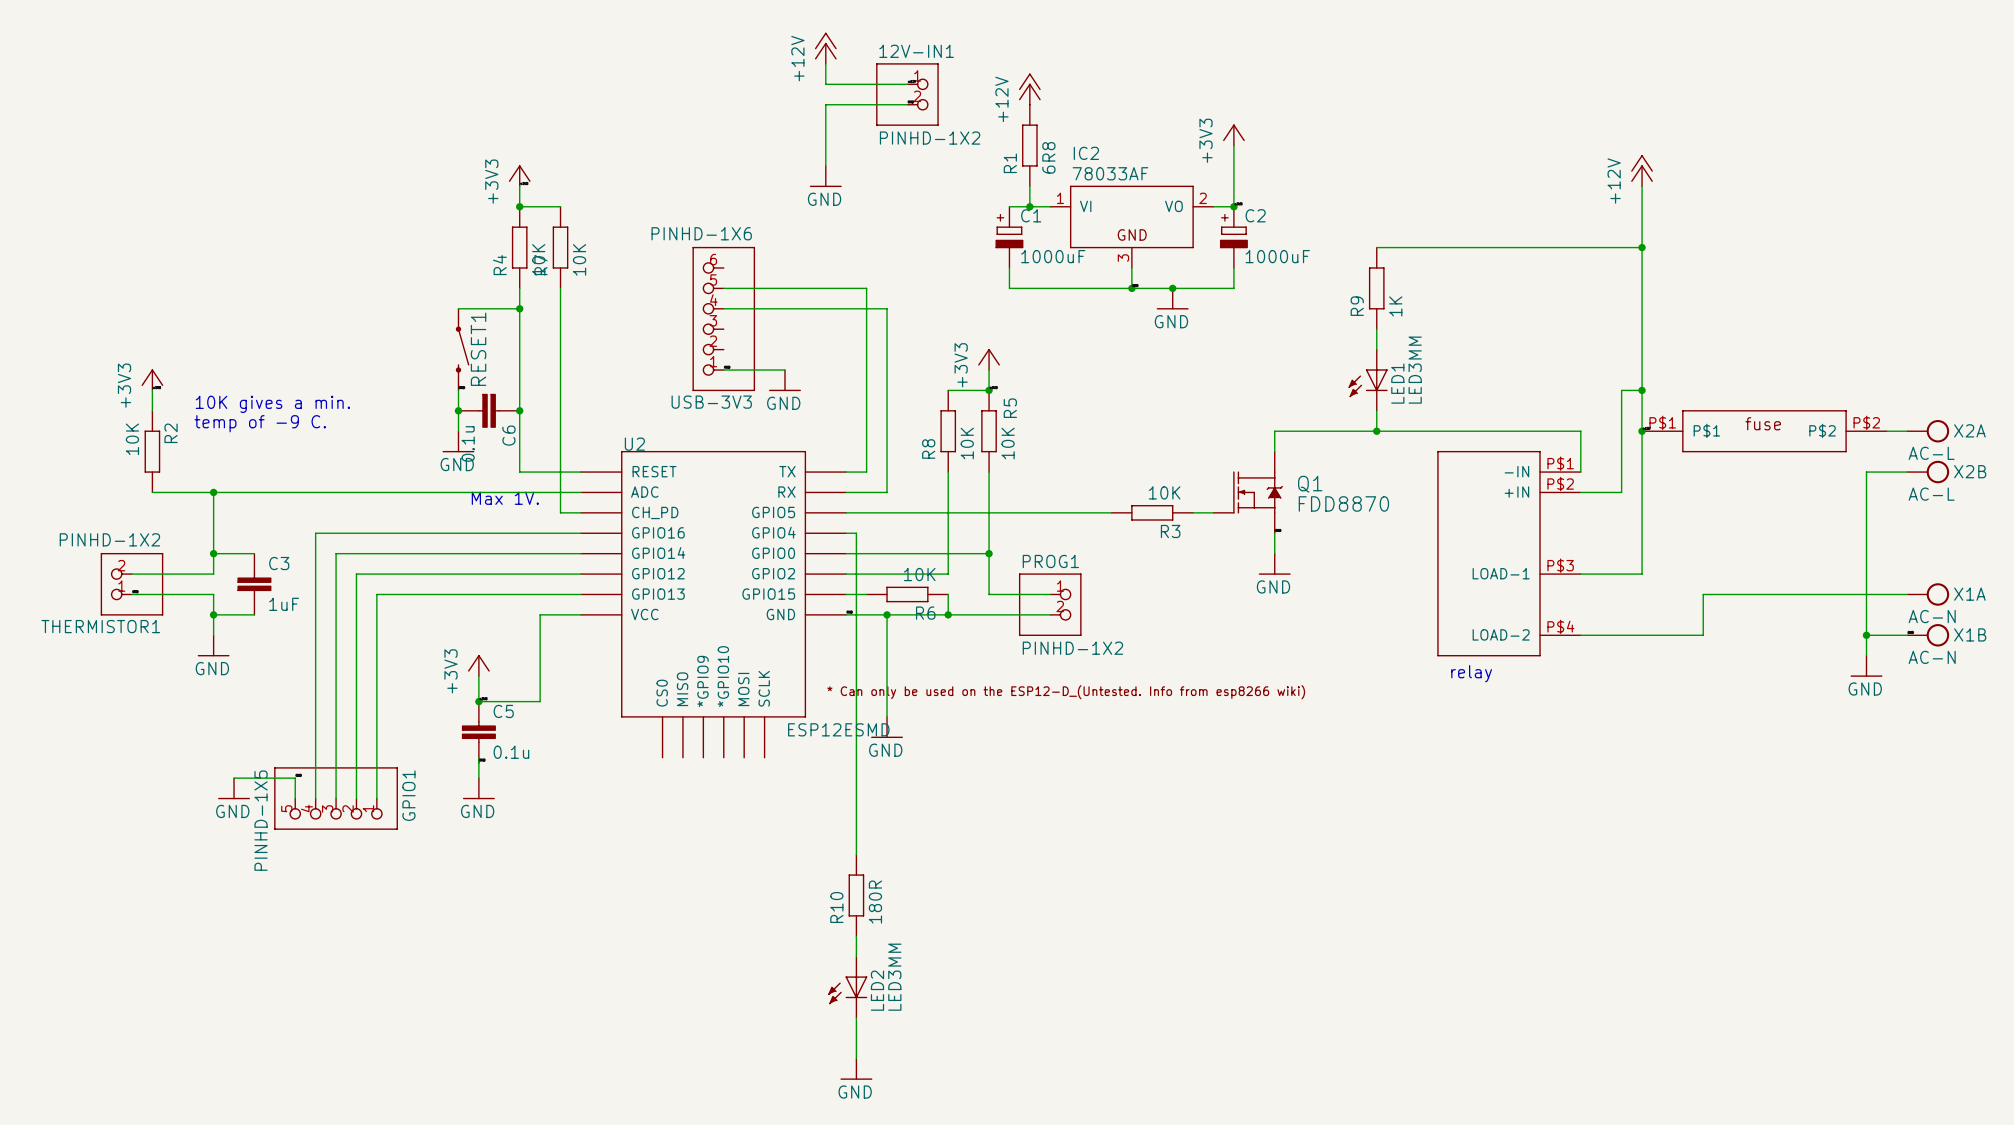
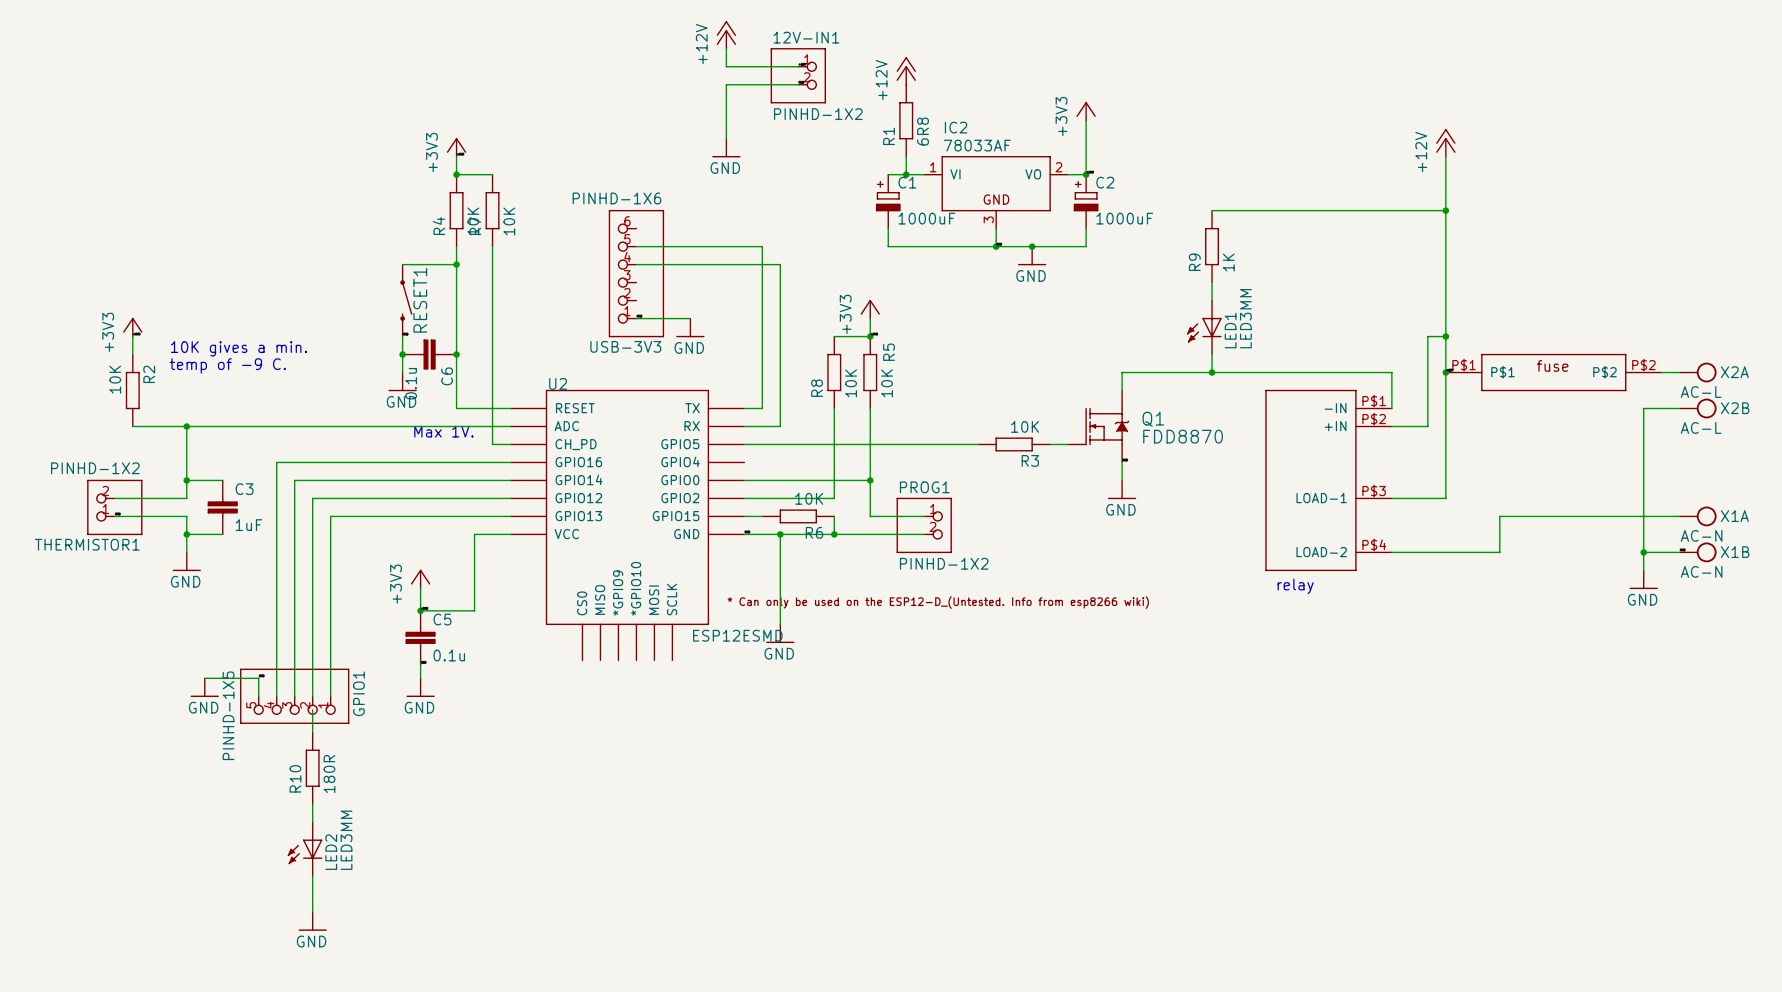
wire: (846, 533) (856, 533) (856, 854) -> none
wire: none -> (312, 709) (312, 732)
R10 position: (856, 895) -> (312, 768)
wire: none -> (312, 804) (312, 822)
wire: (856, 936) (856, 956) -> none
LED2 position: (847, 987) -> (305, 849)
wire: none -> (312, 876) (312, 912)
wire: (856, 1017) (856, 1058) -> none
power symbol: none -> GND (312, 921)
power symbol: GND (856, 1068) -> none

